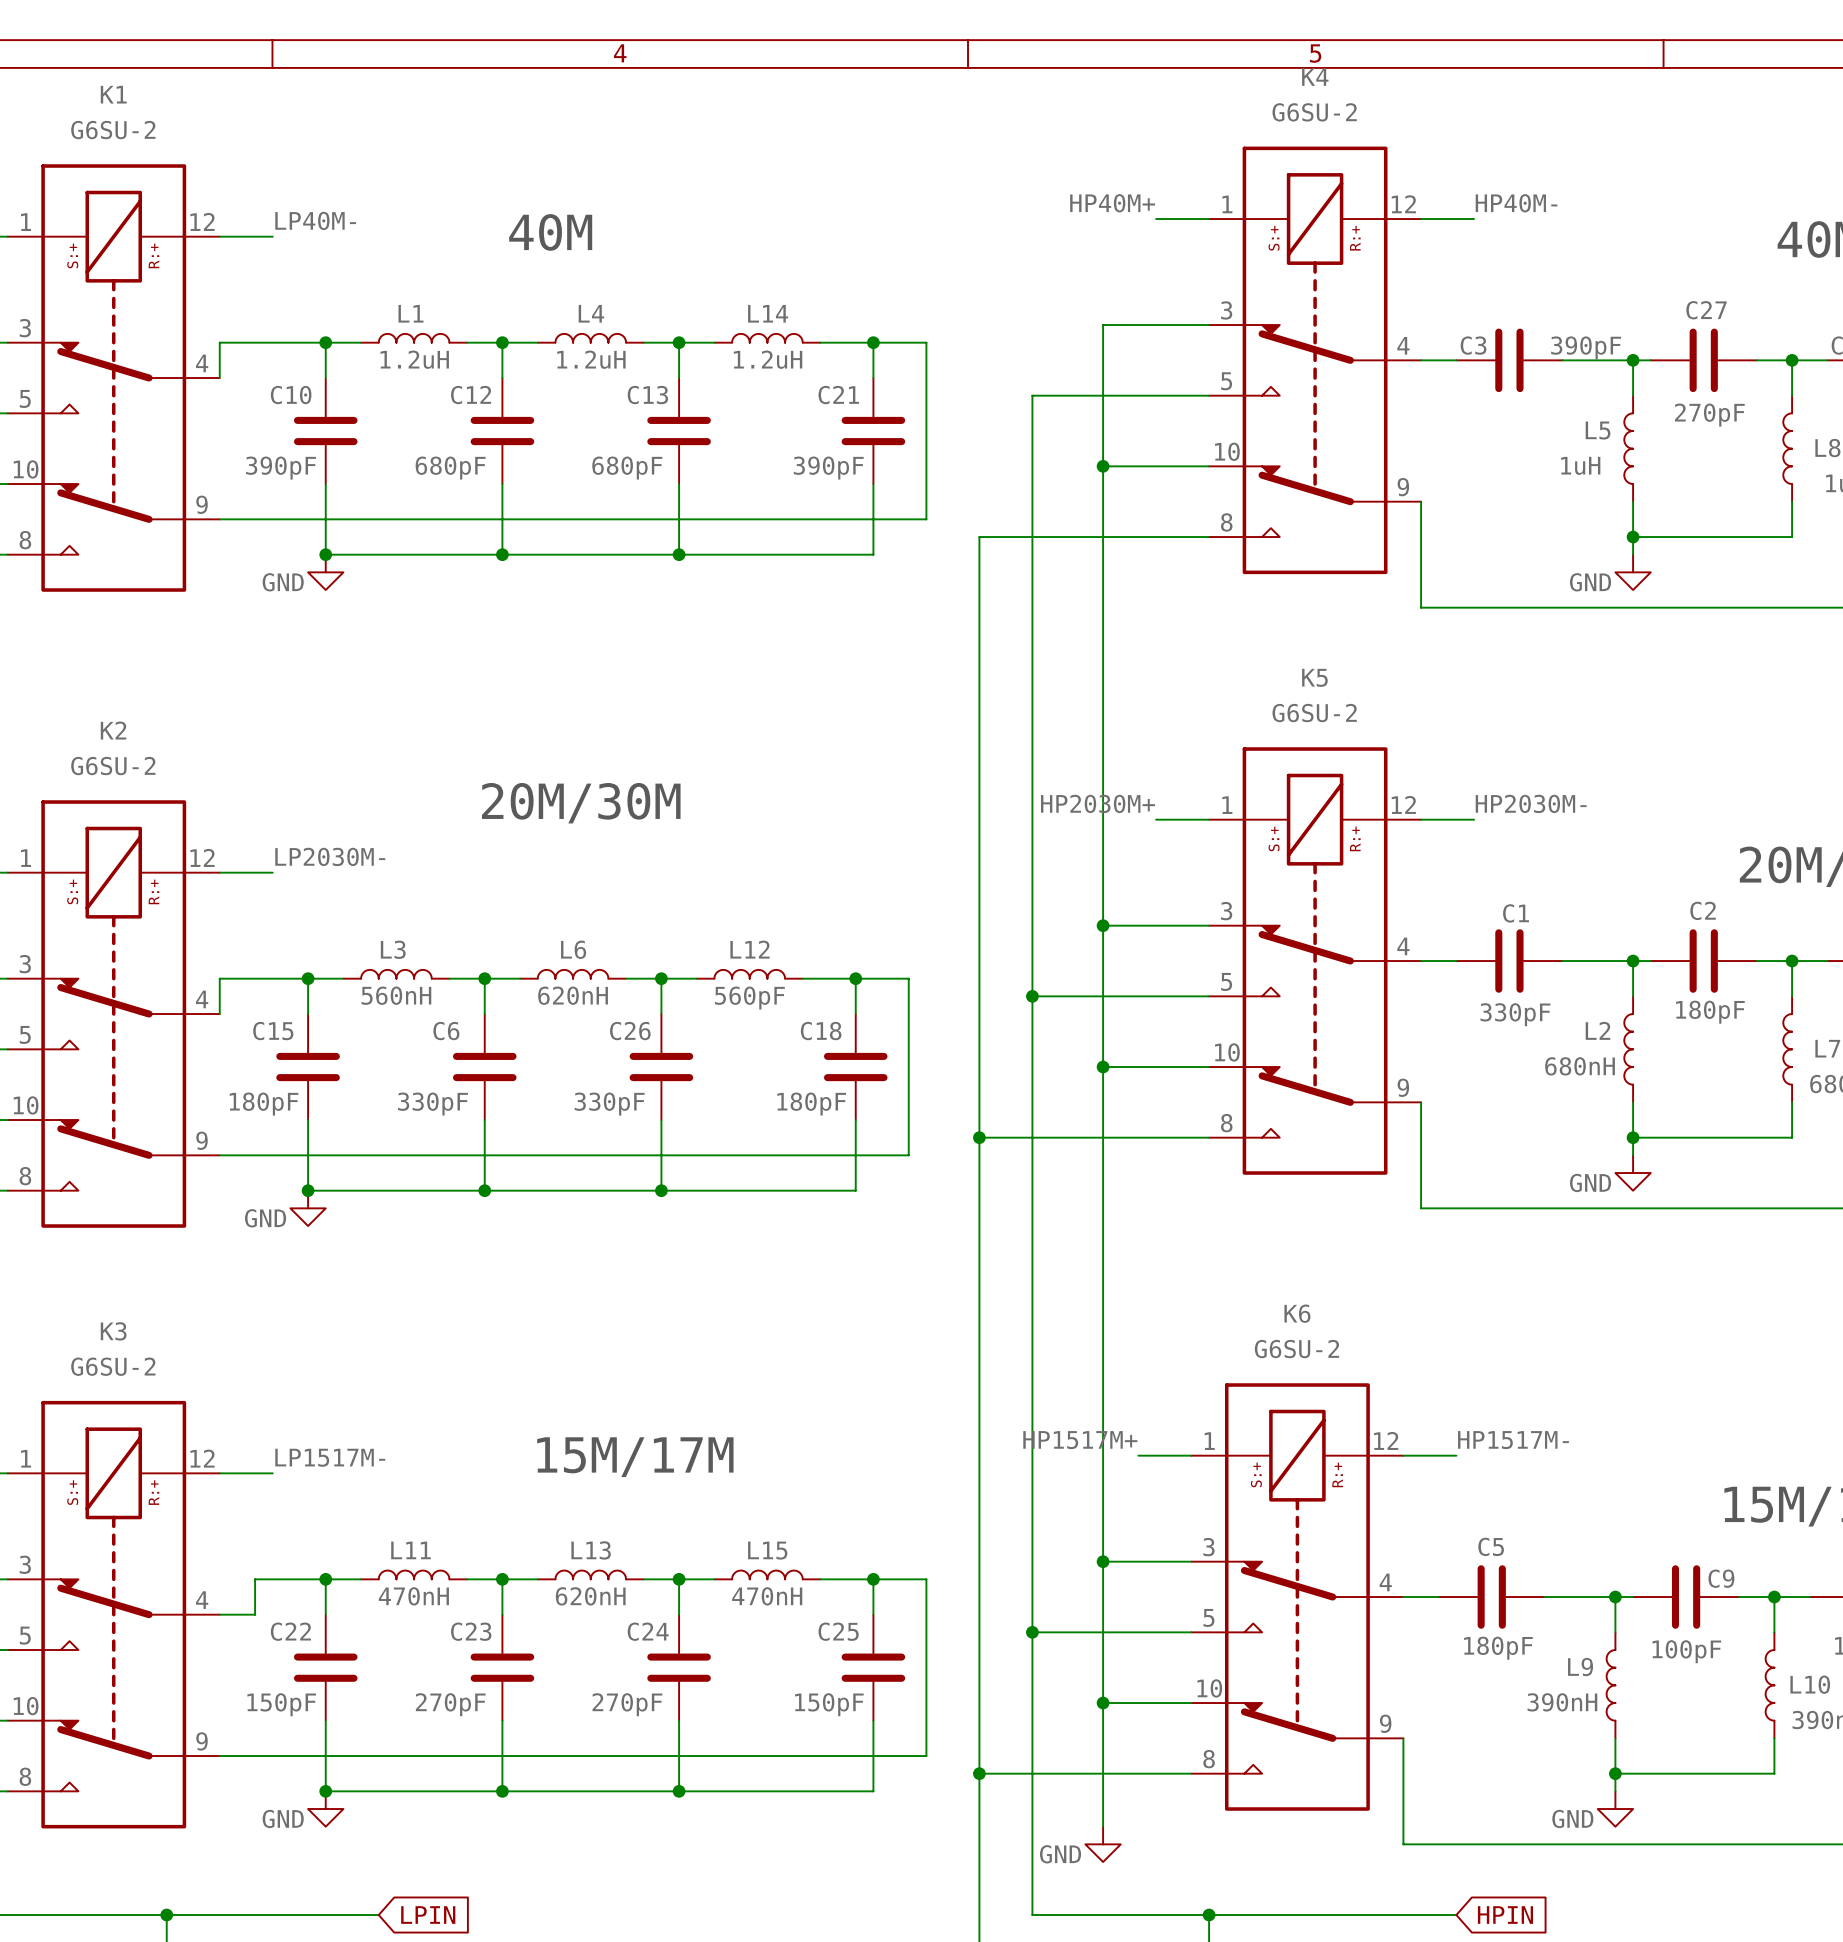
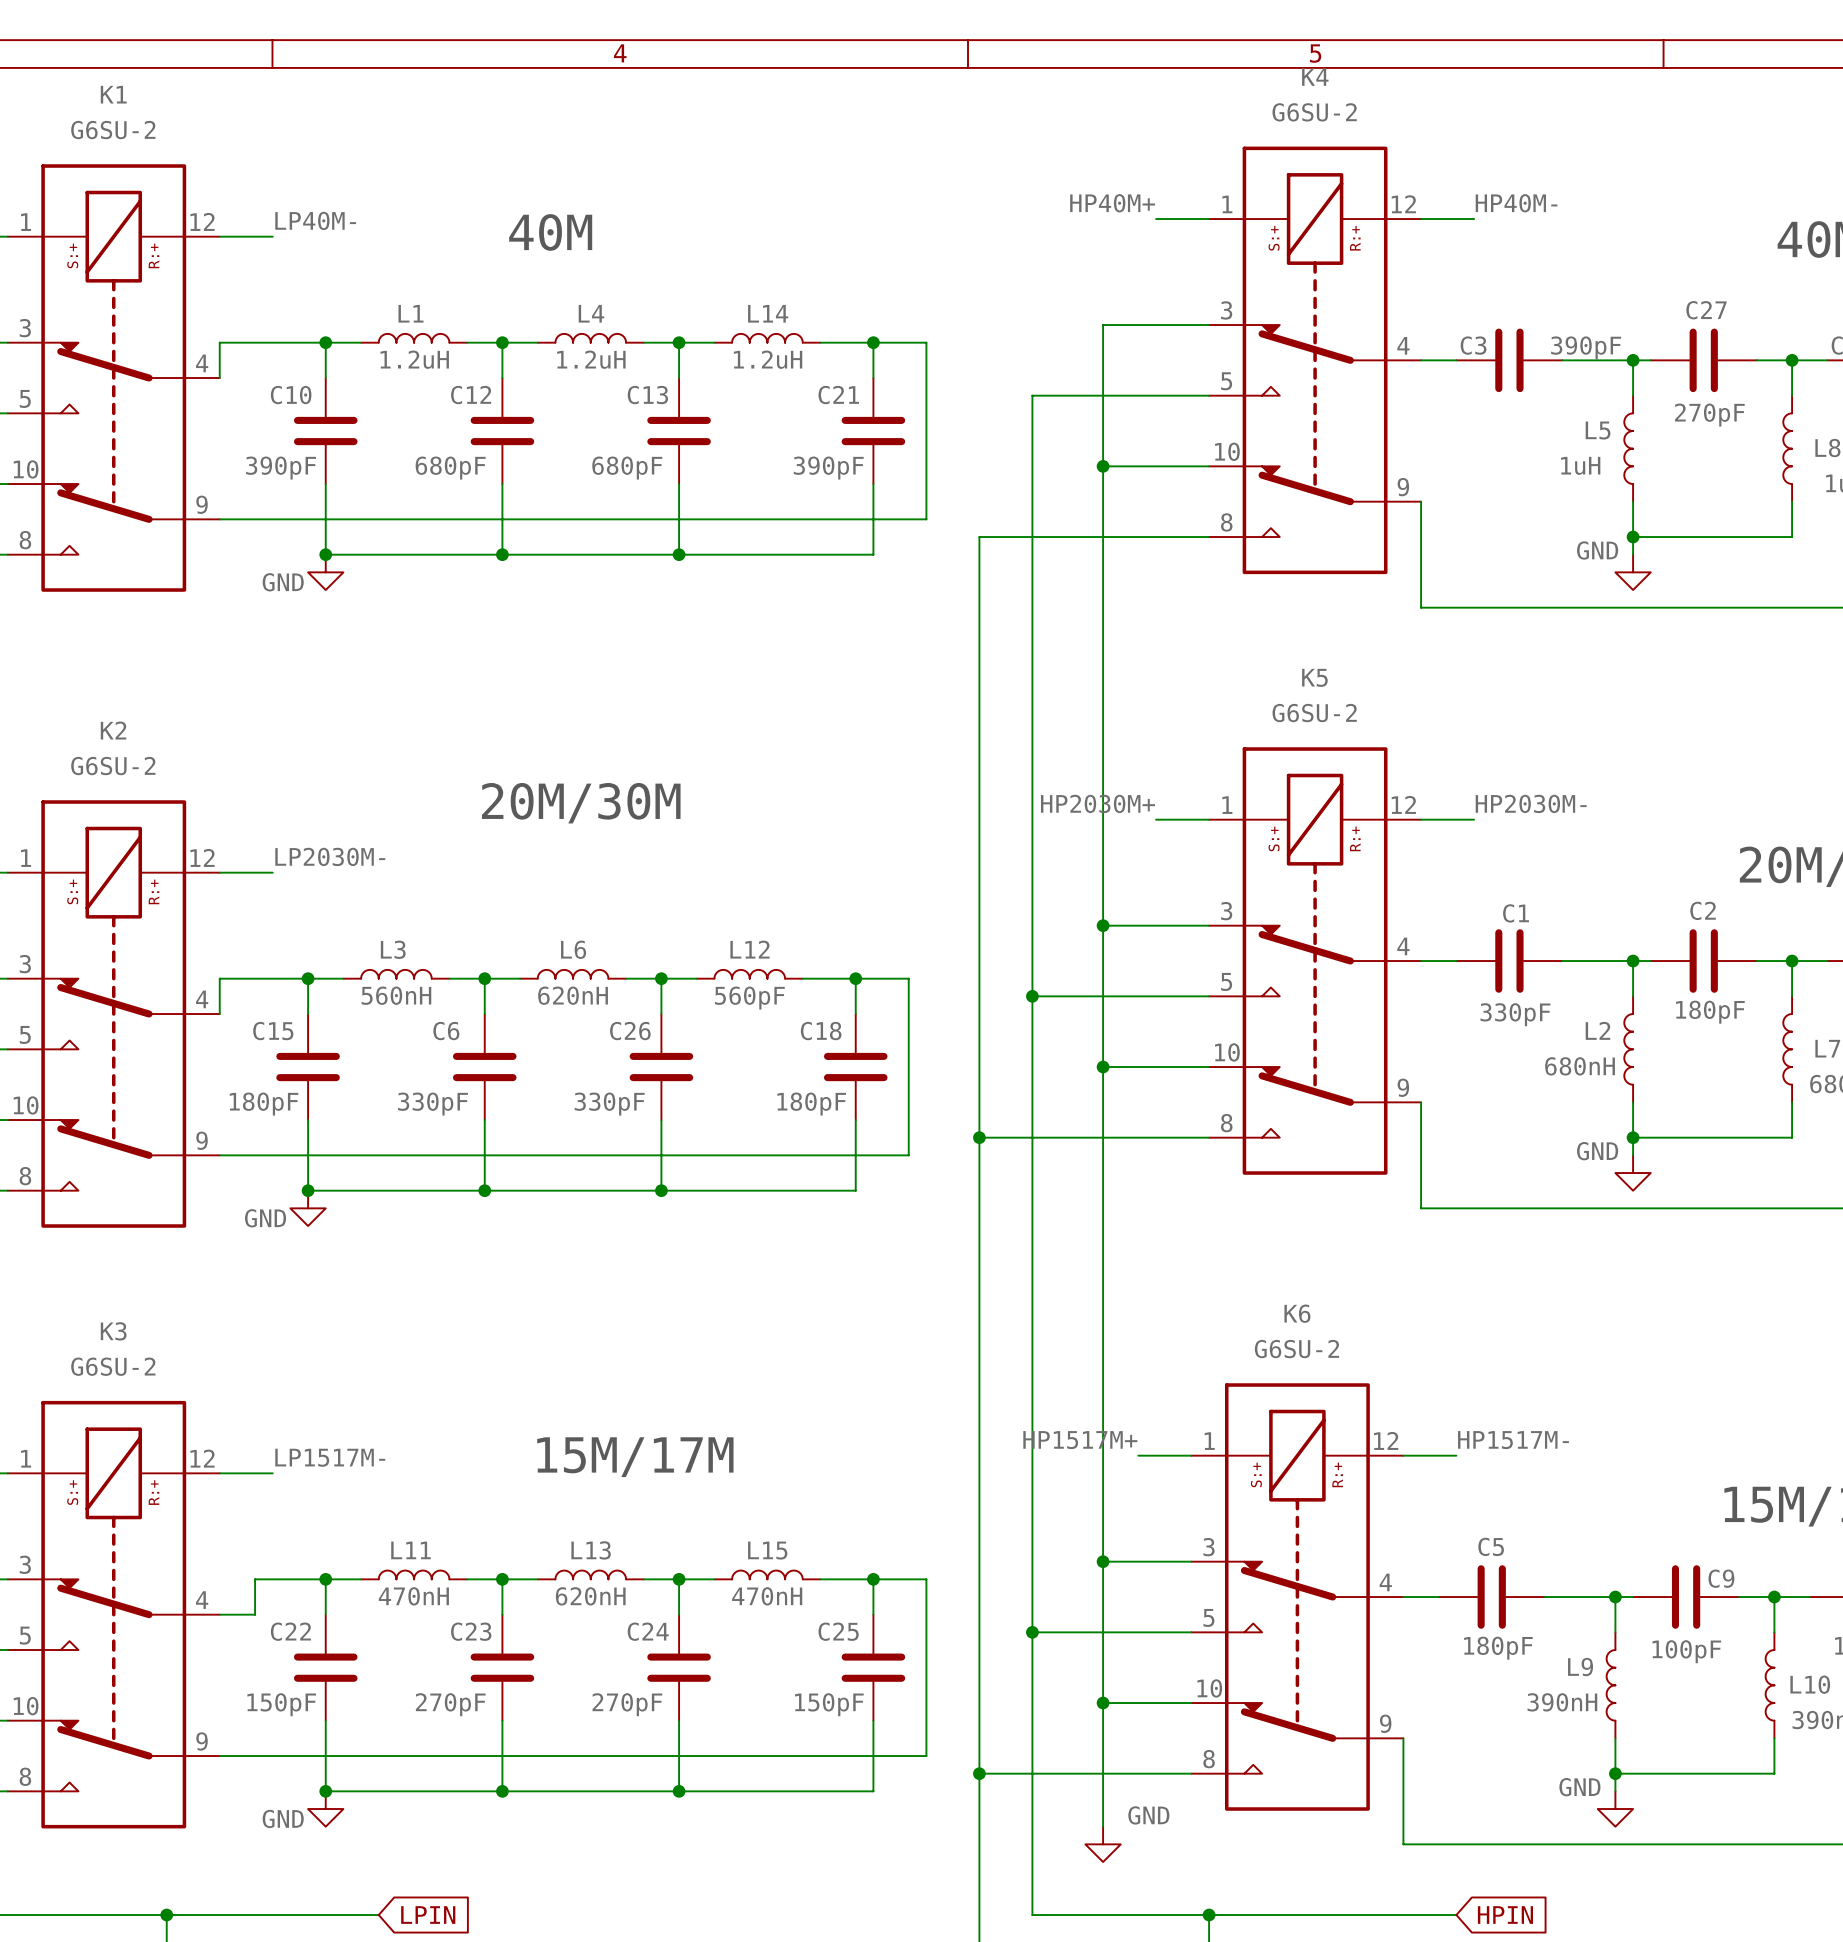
power symbol text position: GND (1590, 582) -> GND (1597, 550)
power symbol text position: GND (1590, 1182) -> GND (1597, 1151)
power symbol text position: GND (1572, 1818) -> GND (1579, 1787)
power symbol text position: GND (1060, 1854) -> GND (1148, 1815)

